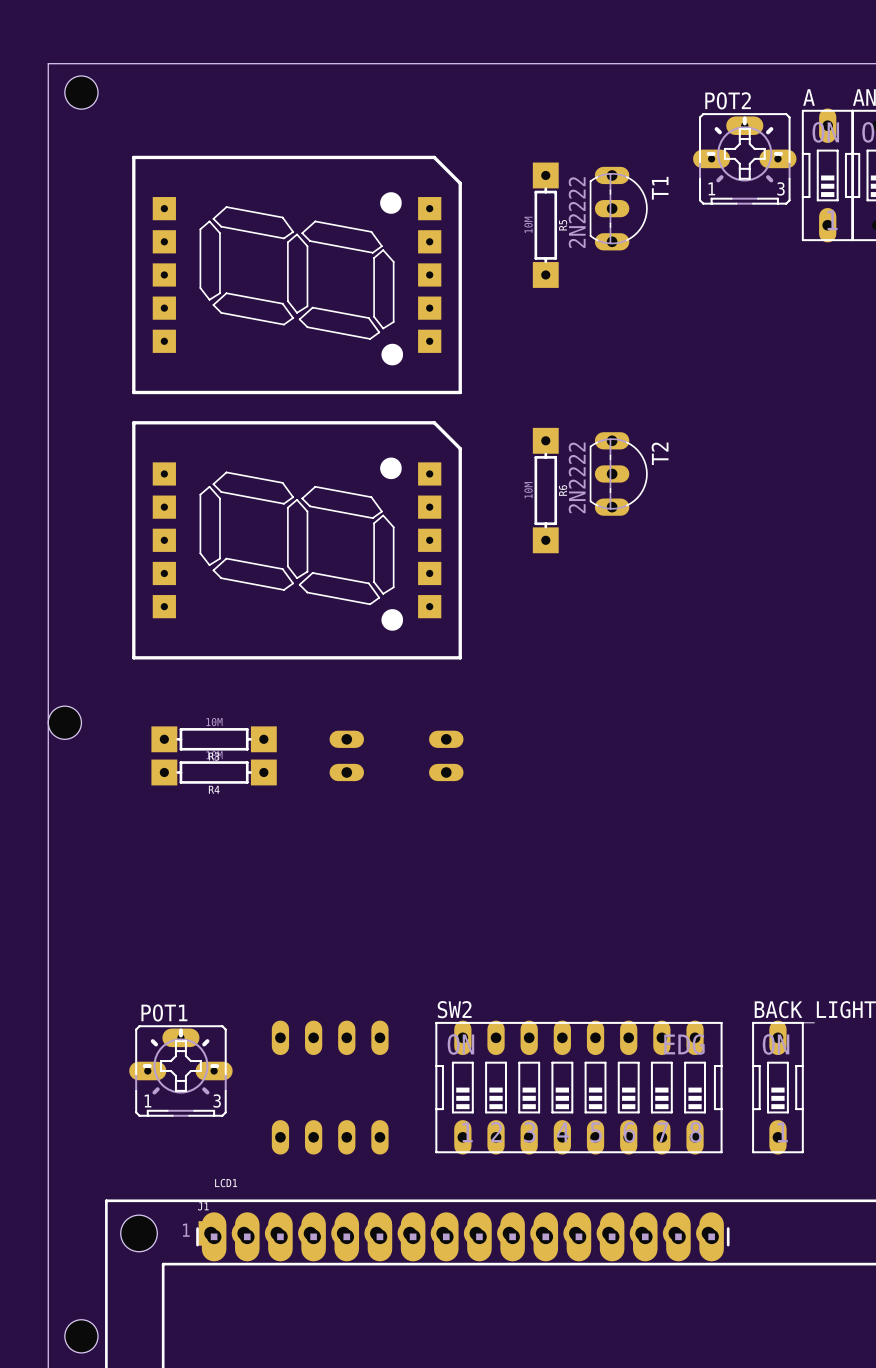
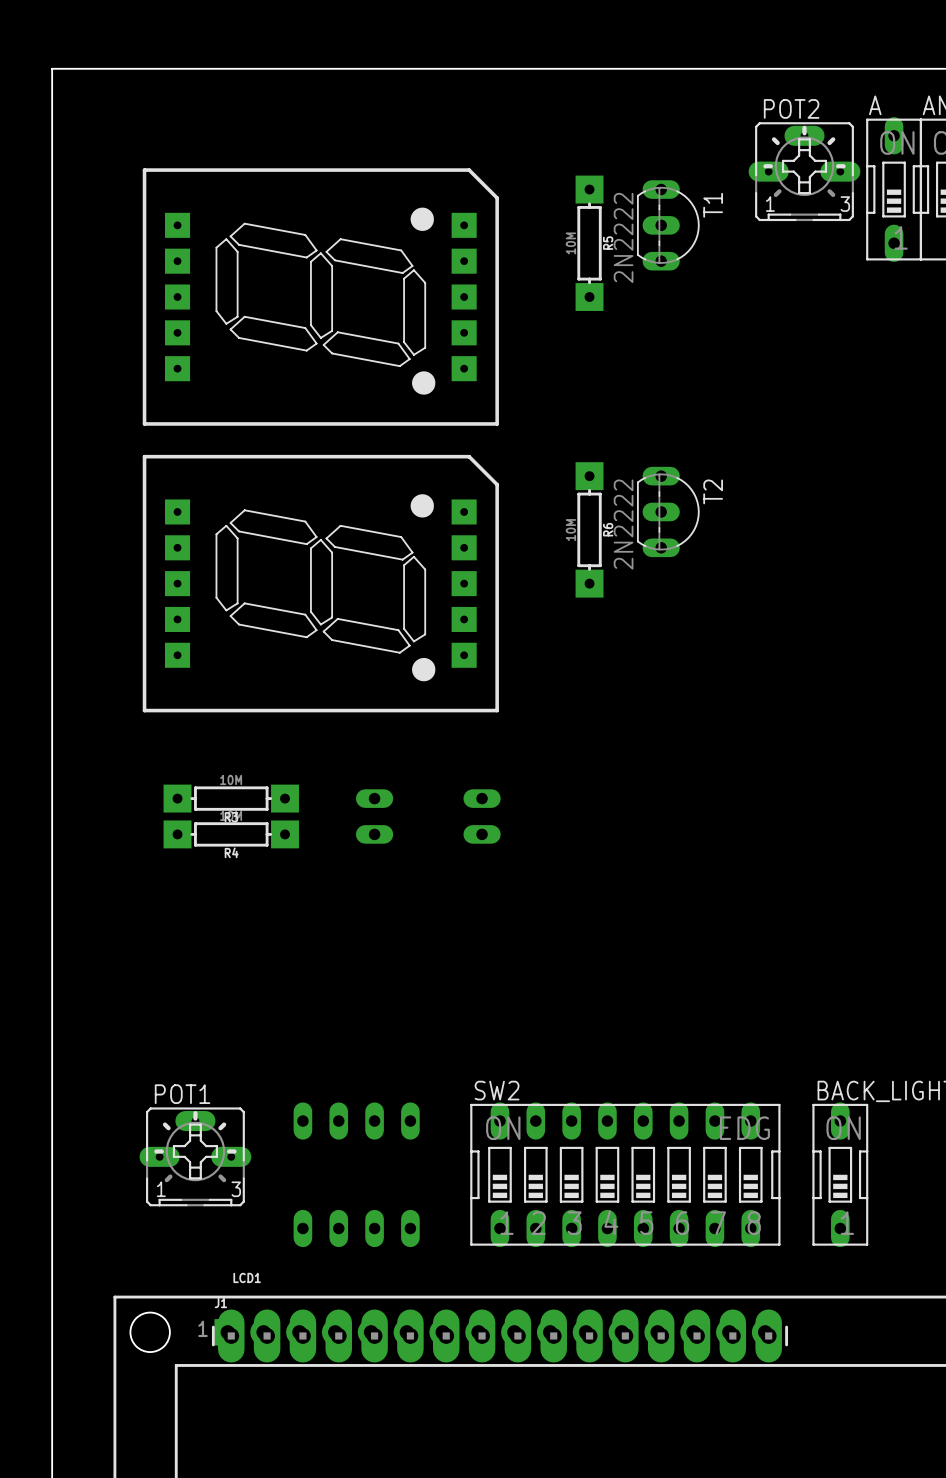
hole: (81, 92) -> none
hole: (64, 722) -> none
hole: (81, 1336) -> none

